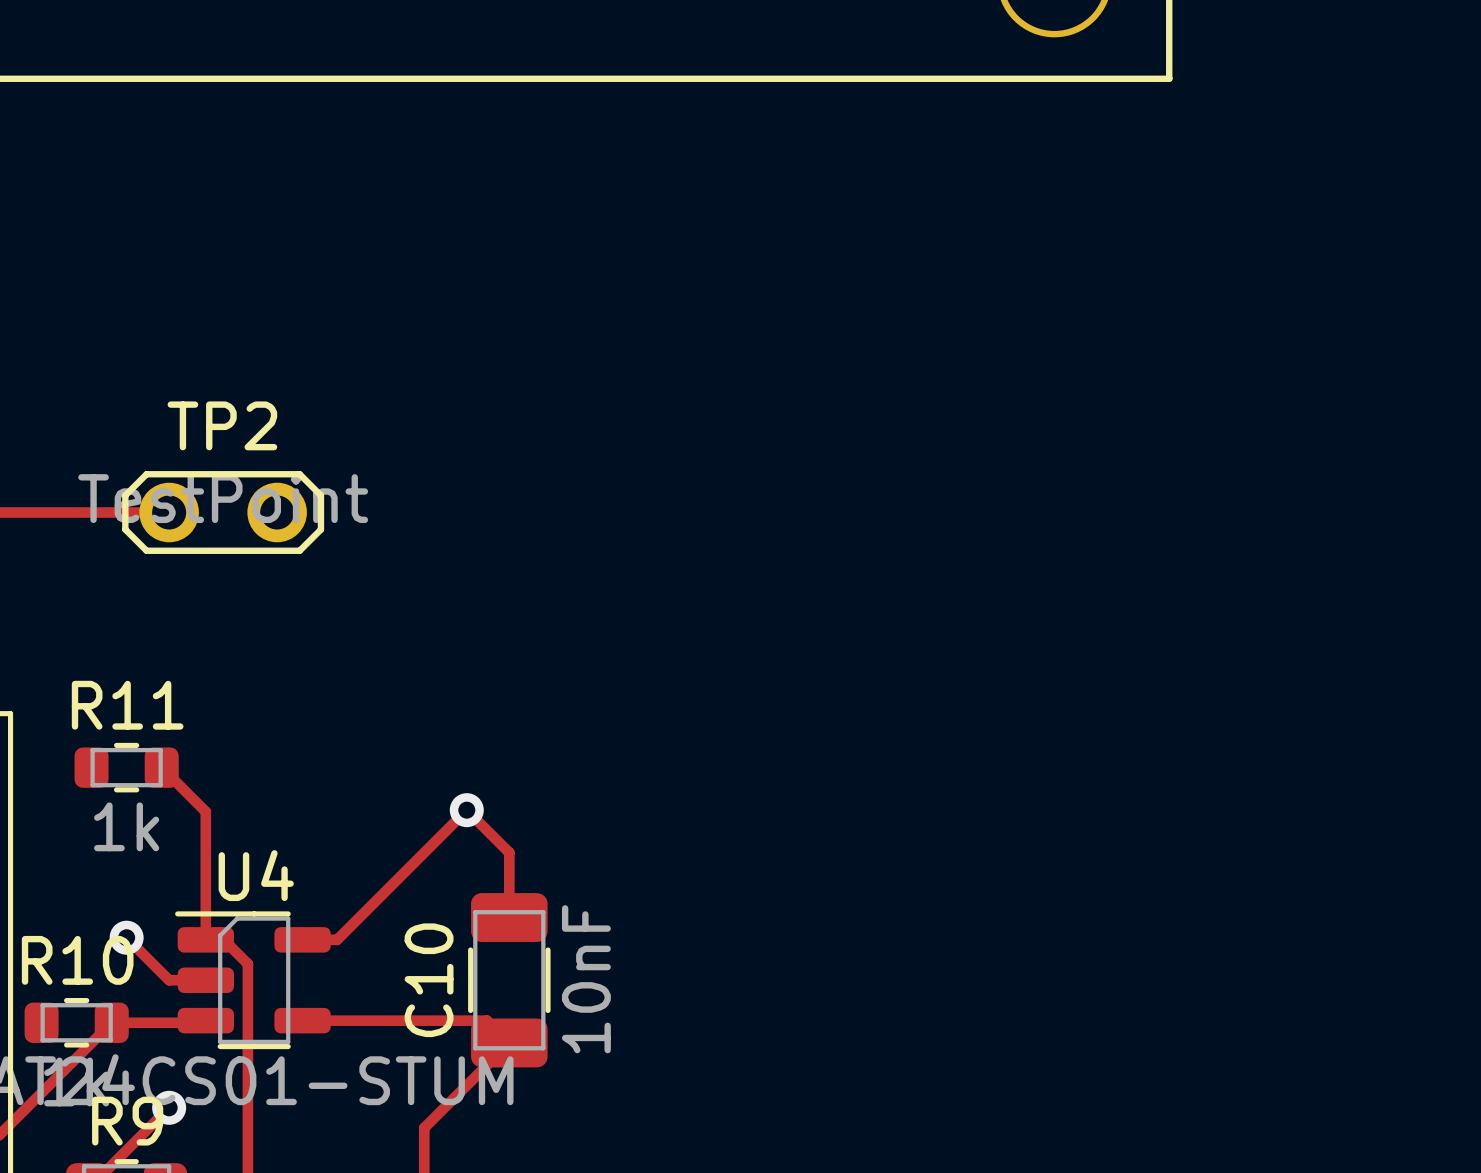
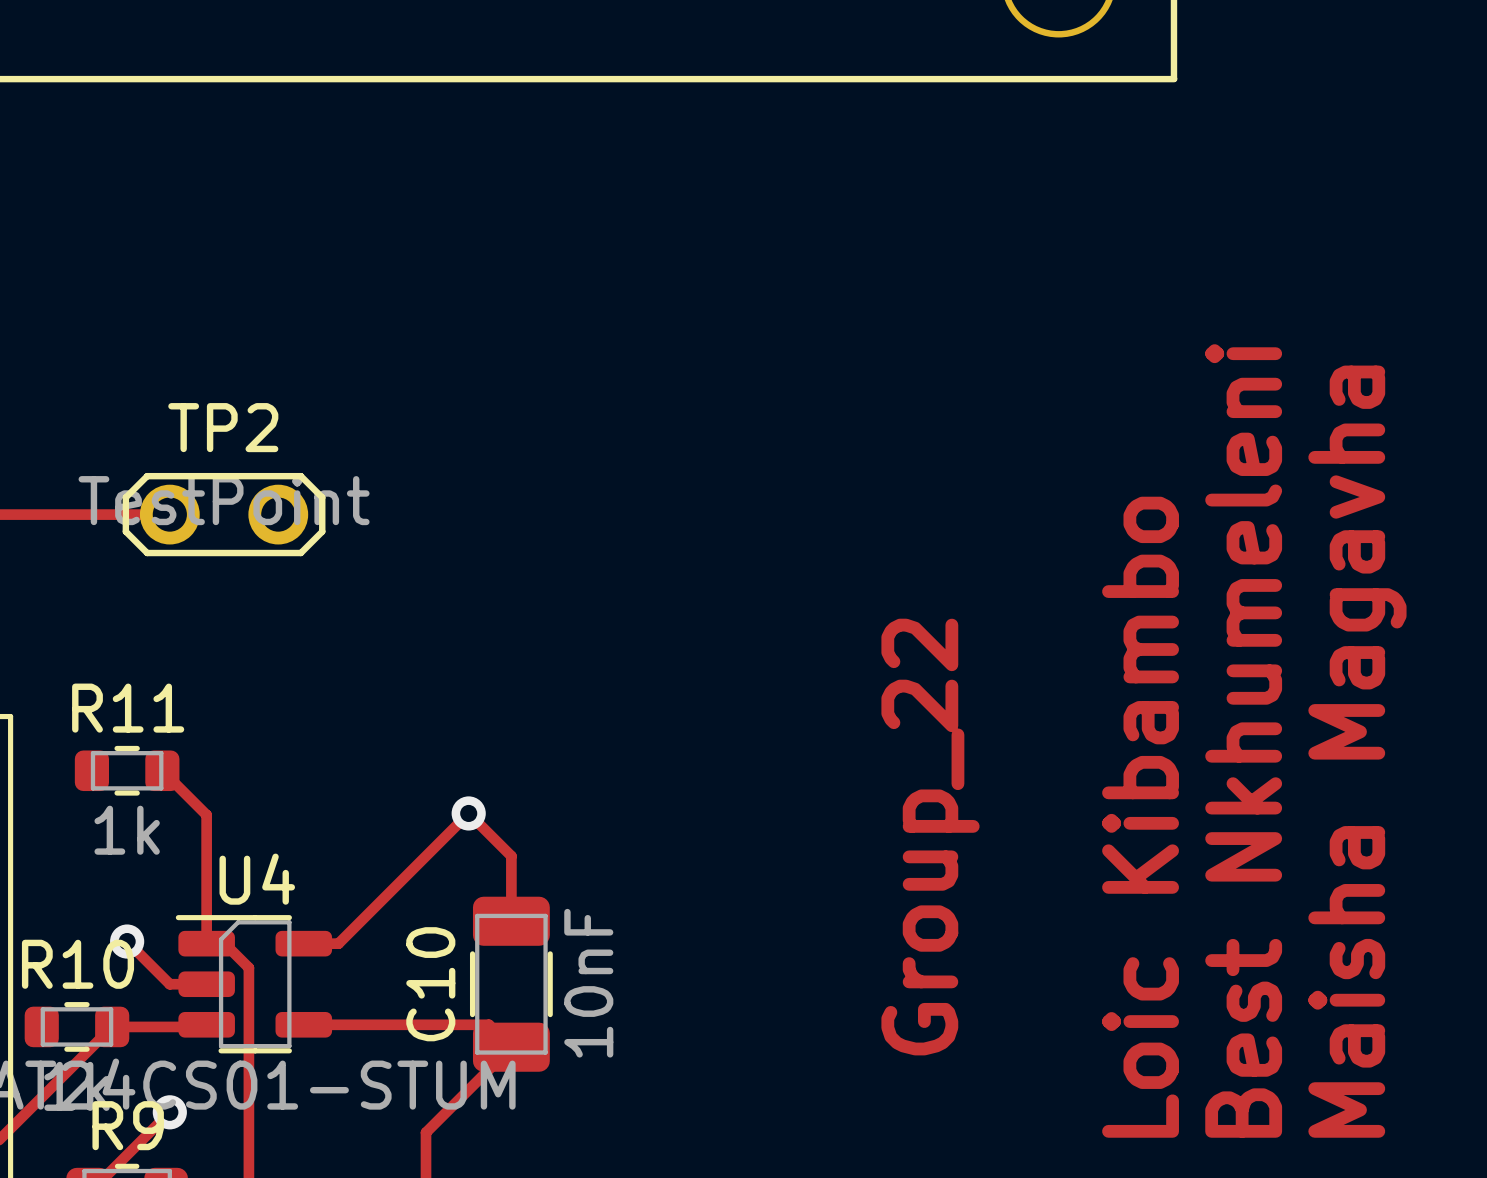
text: none -> Best Nkhumeleni (1243, 740)
text: none -> Maisha Magavha (1357, 751)
text: none -> Loic Kibambo (1140, 817)
text: none -> Group_22 (930, 837)

